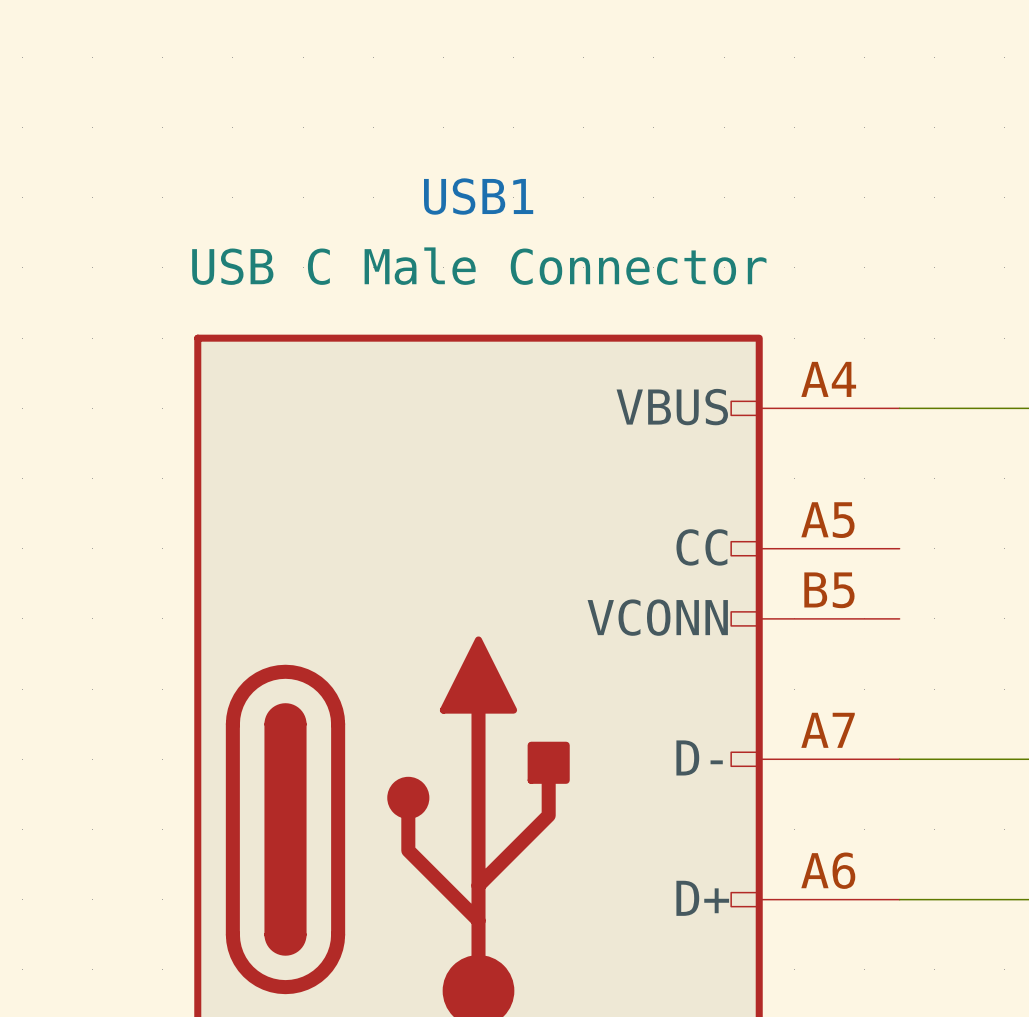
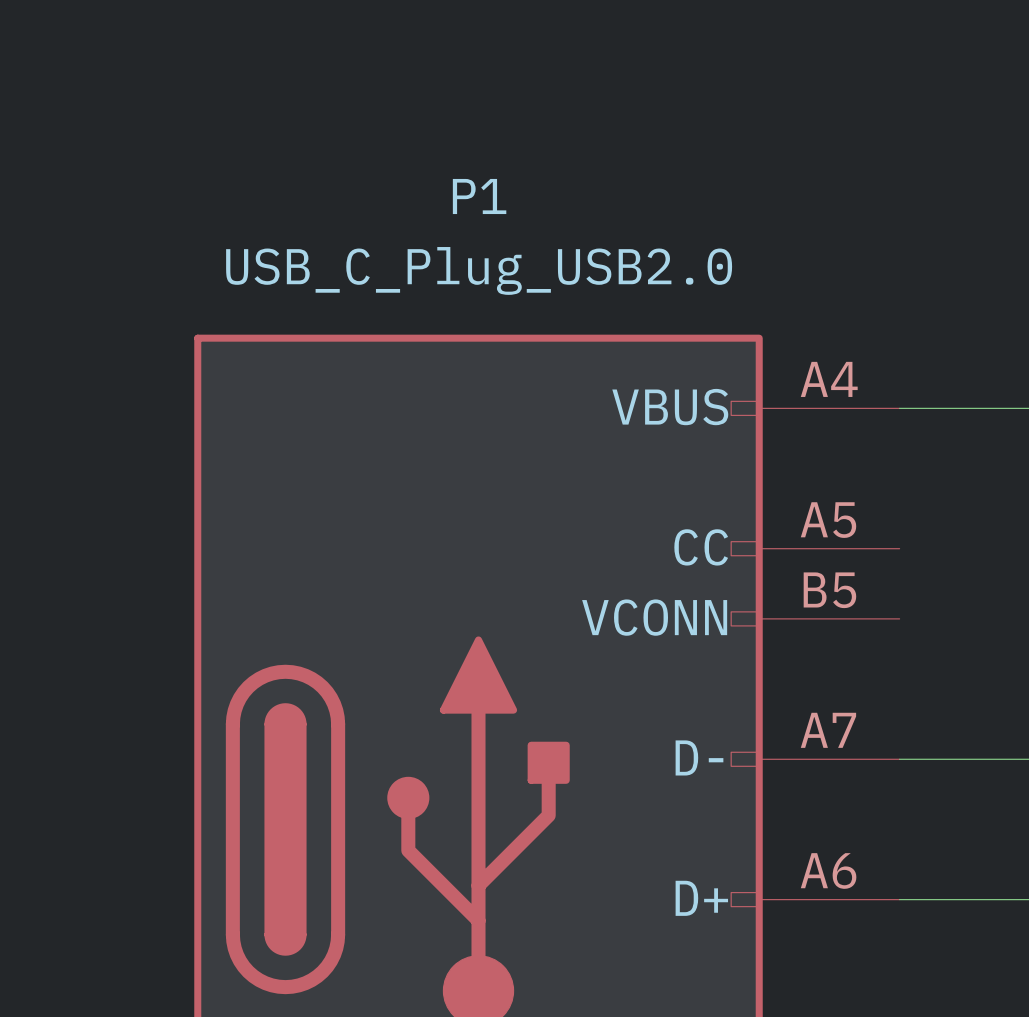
USB1 name: USB1 (478, 196) -> P1 (479, 196)
USB1 value: USB C Male Connector (479, 266) -> USB_C_Plug_USB2.0 (479, 270)

